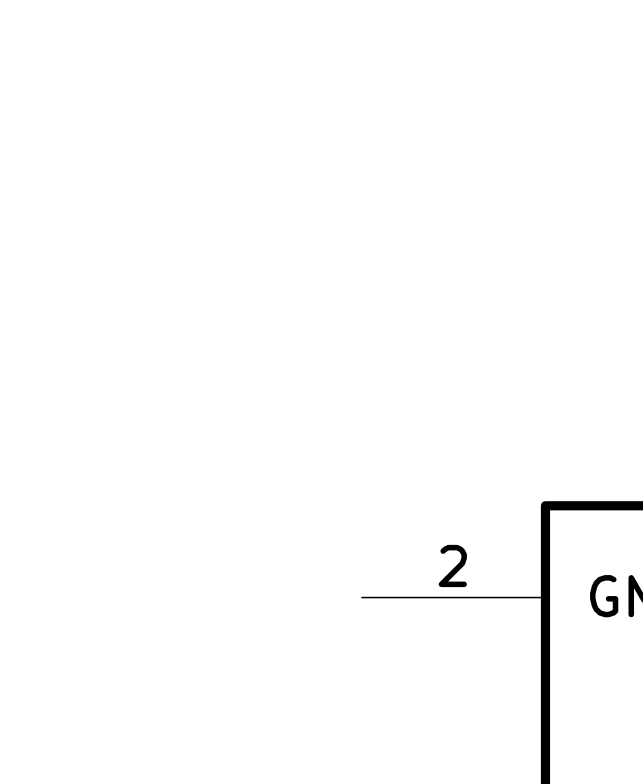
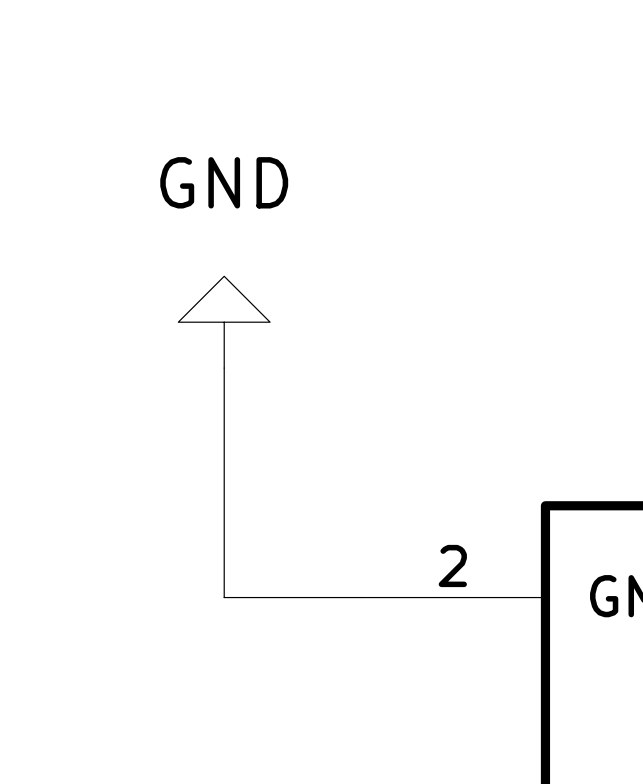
power symbol: none -> GND (224, 322)
wire: none -> (224, 368) (224, 597) (361, 597)

